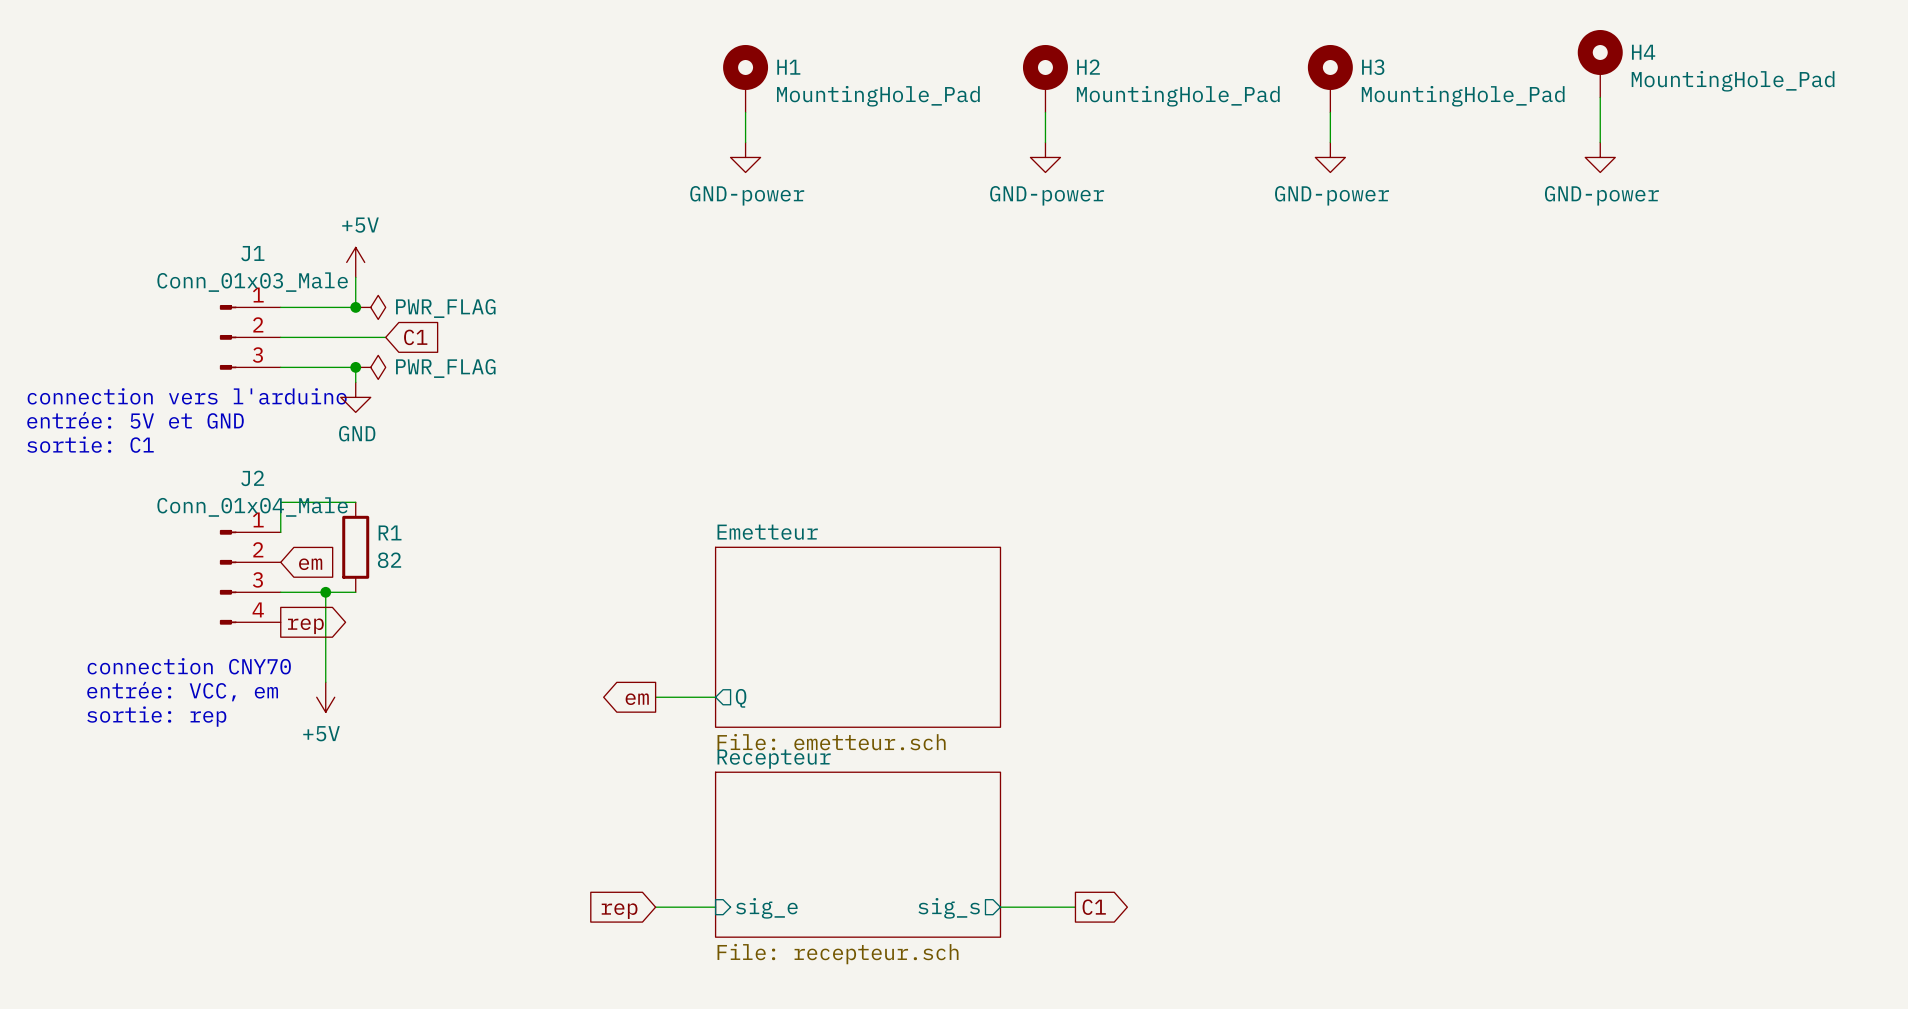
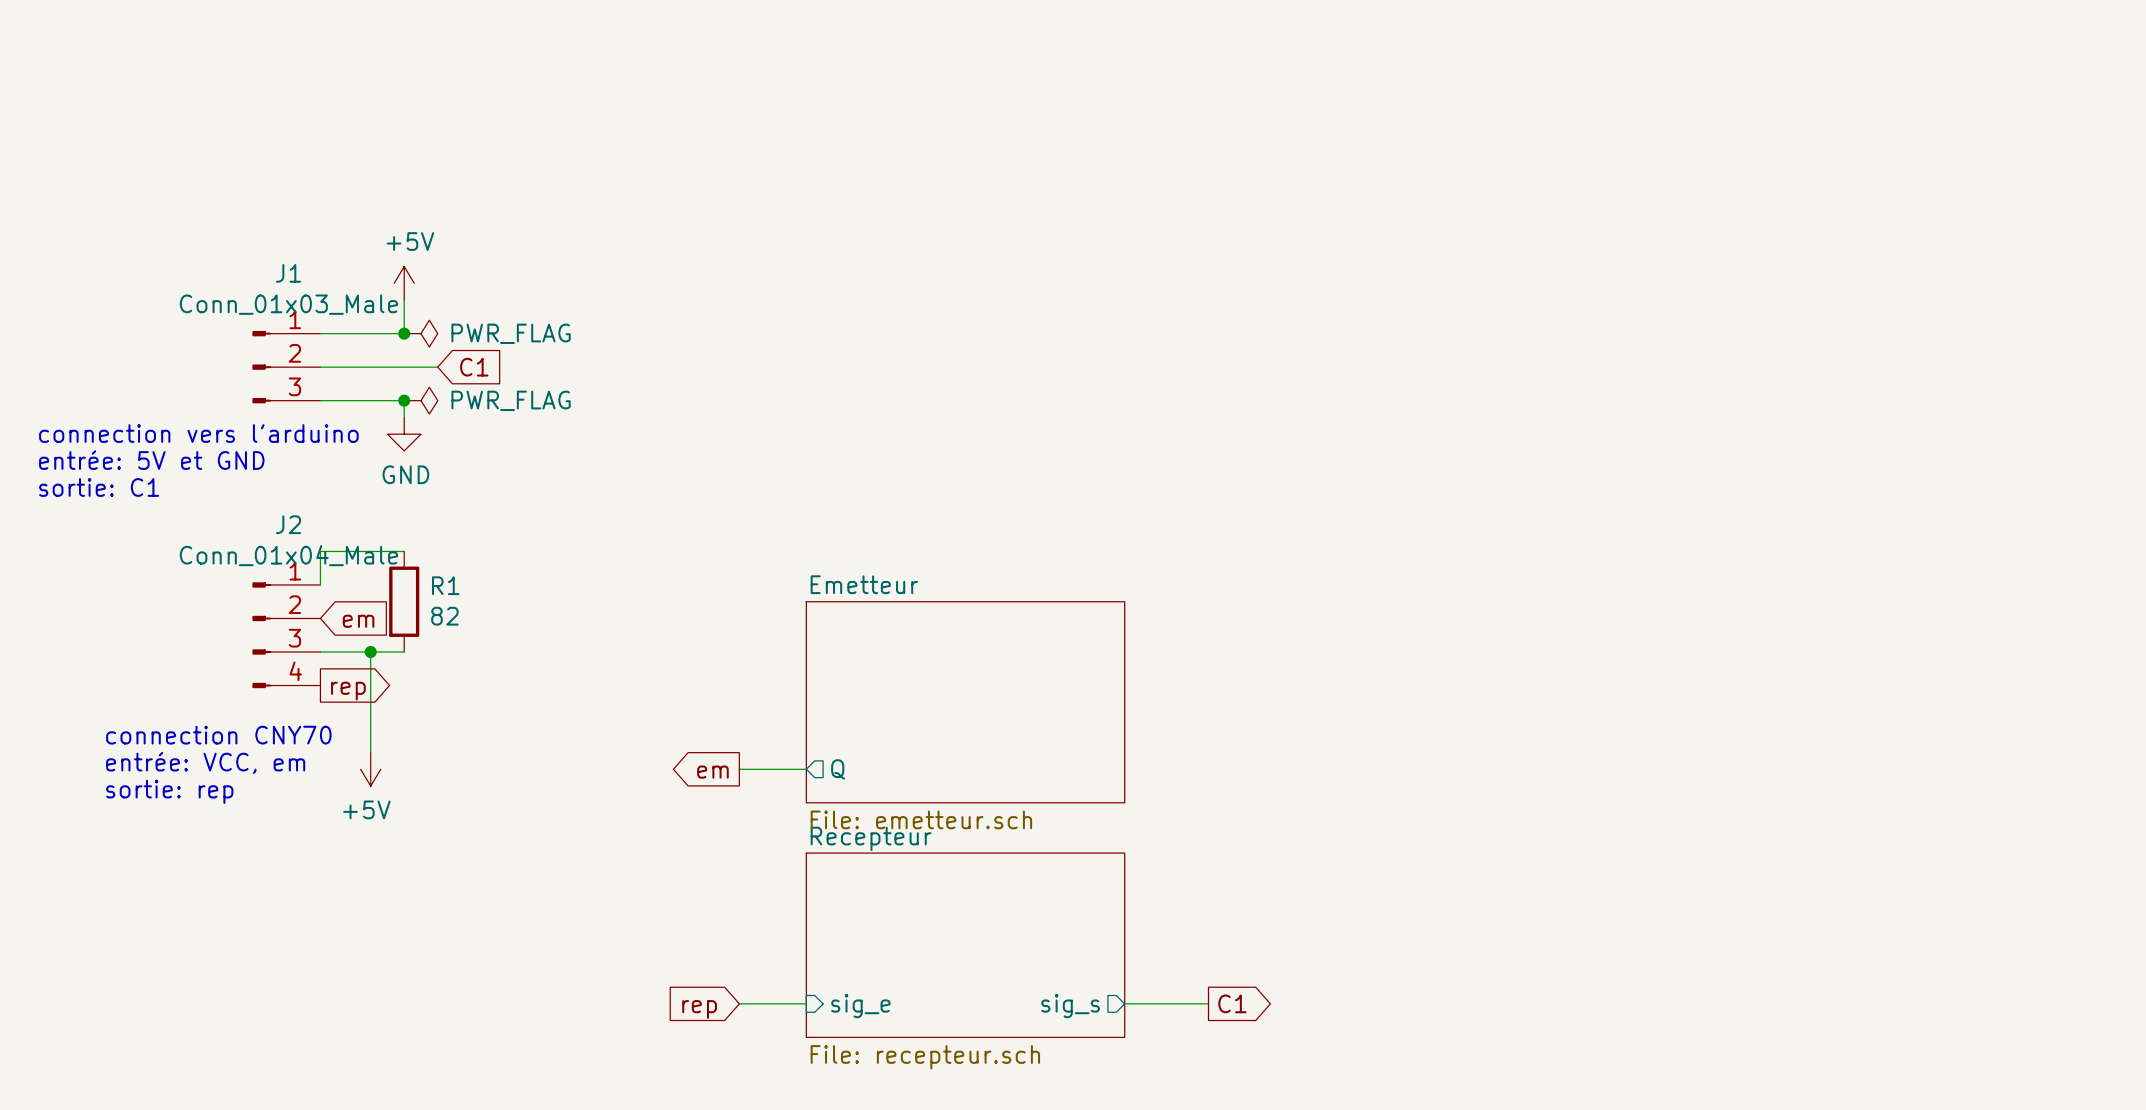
H4: MountingHole_Pad (1600, 63) -> none
H1: MountingHole_Pad (745, 78) -> none
H2: MountingHole_Pad (1045, 78) -> none
H3: MountingHole_Pad (1330, 78) -> none
wire: (1600, 97) (1600, 142) -> none
wire: (745, 112) (745, 142) -> none
wire: (1045, 112) (1045, 142) -> none
wire: (1330, 112) (1330, 142) -> none
power symbol: GND-power (745, 157) -> none
power symbol: GND-power (1045, 157) -> none
power symbol: GND-power (1330, 157) -> none
power symbol: GND-power (1600, 157) -> none

